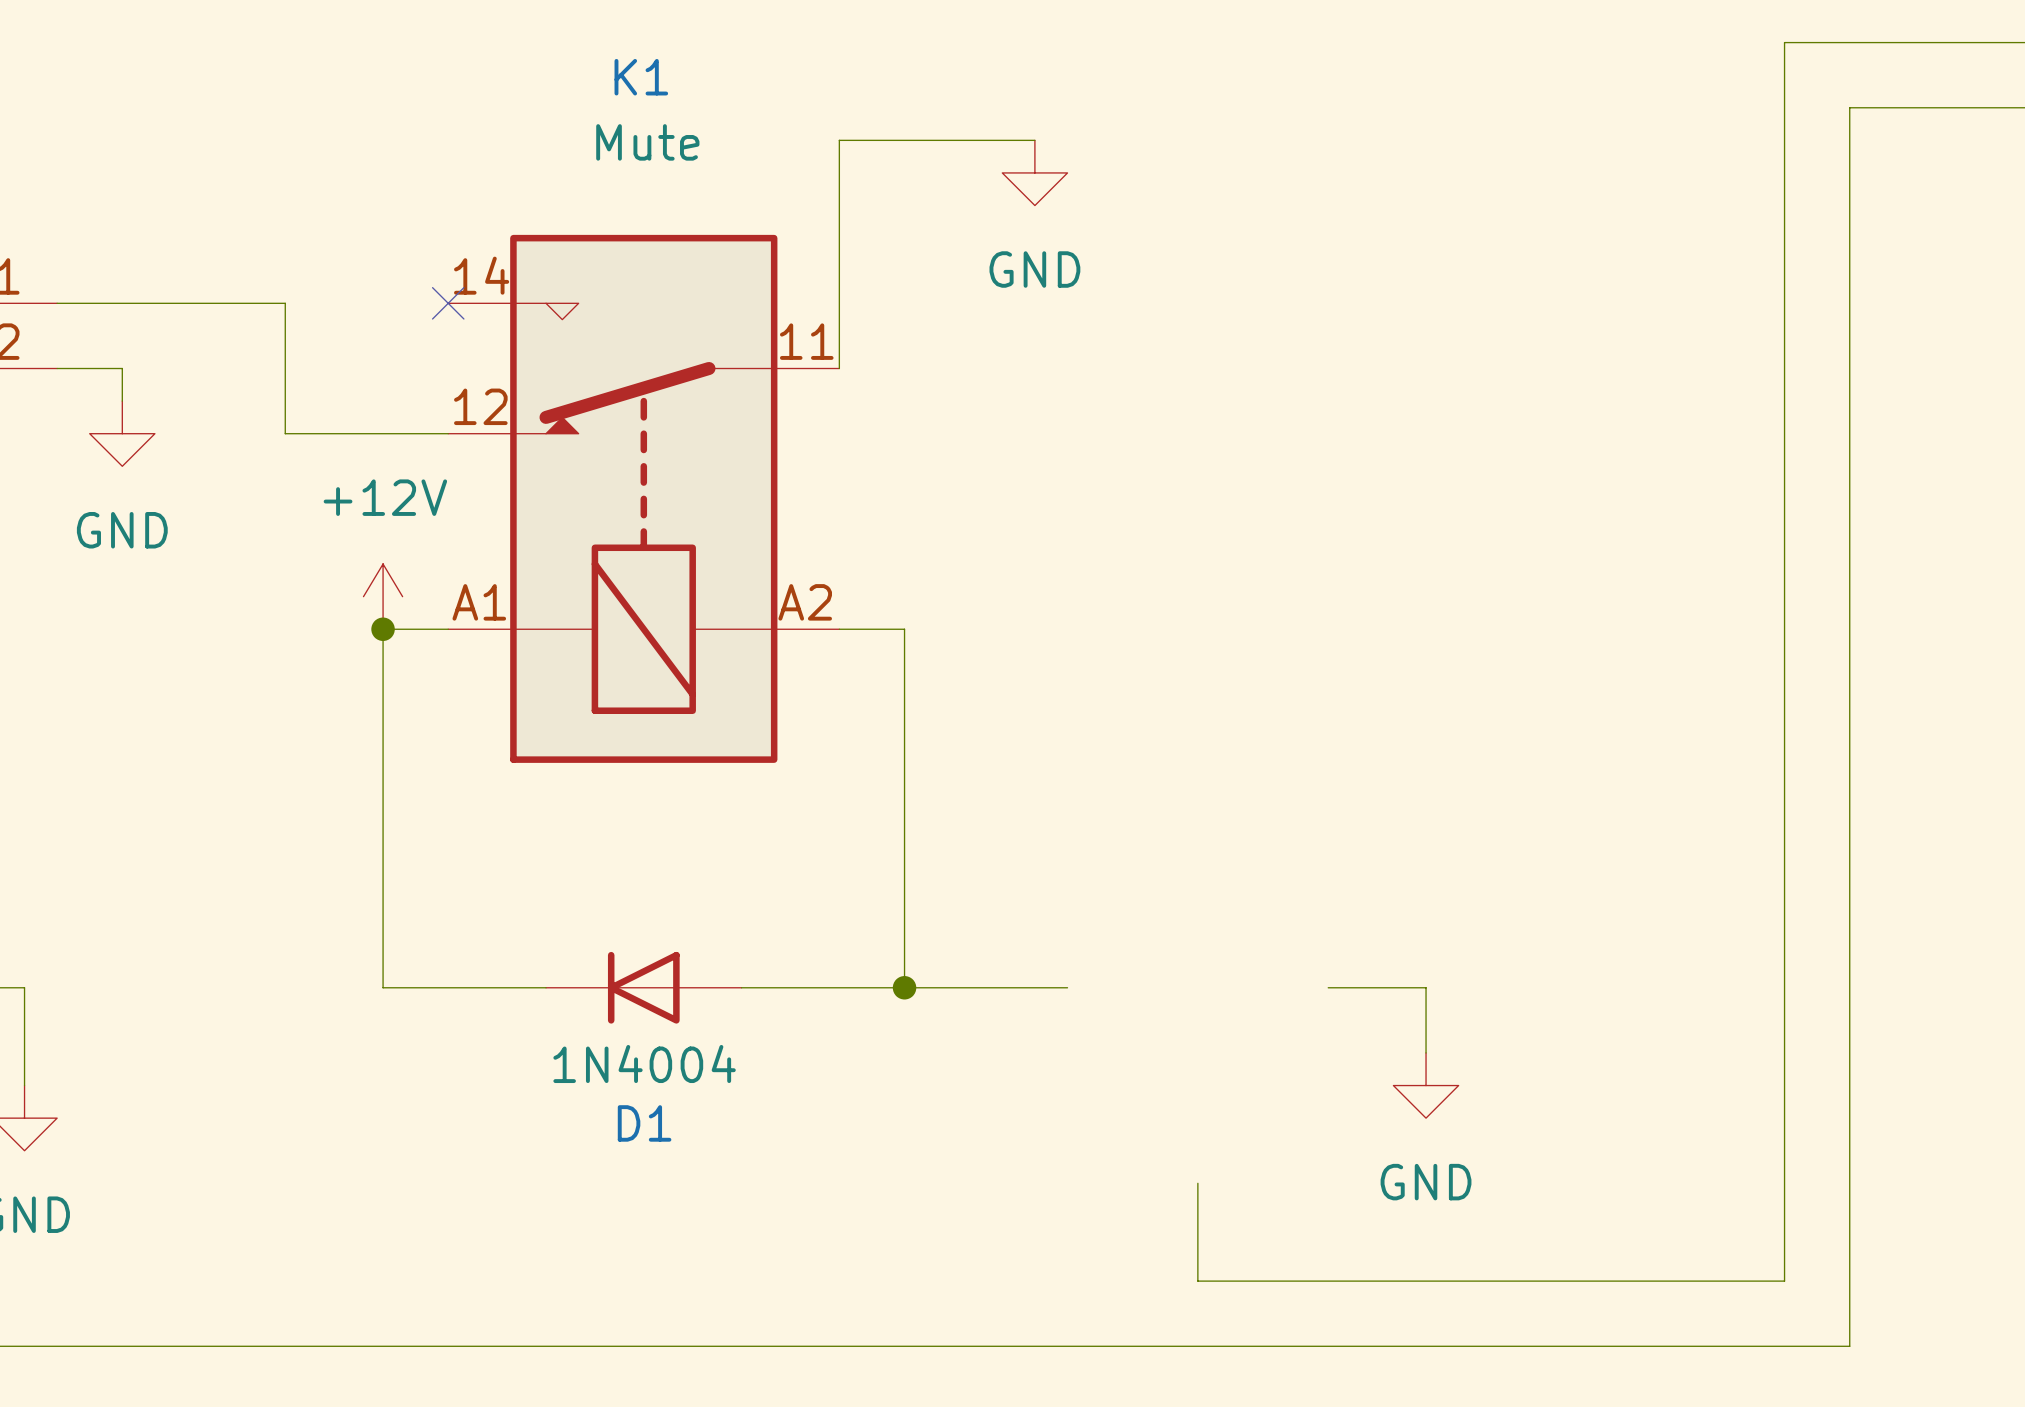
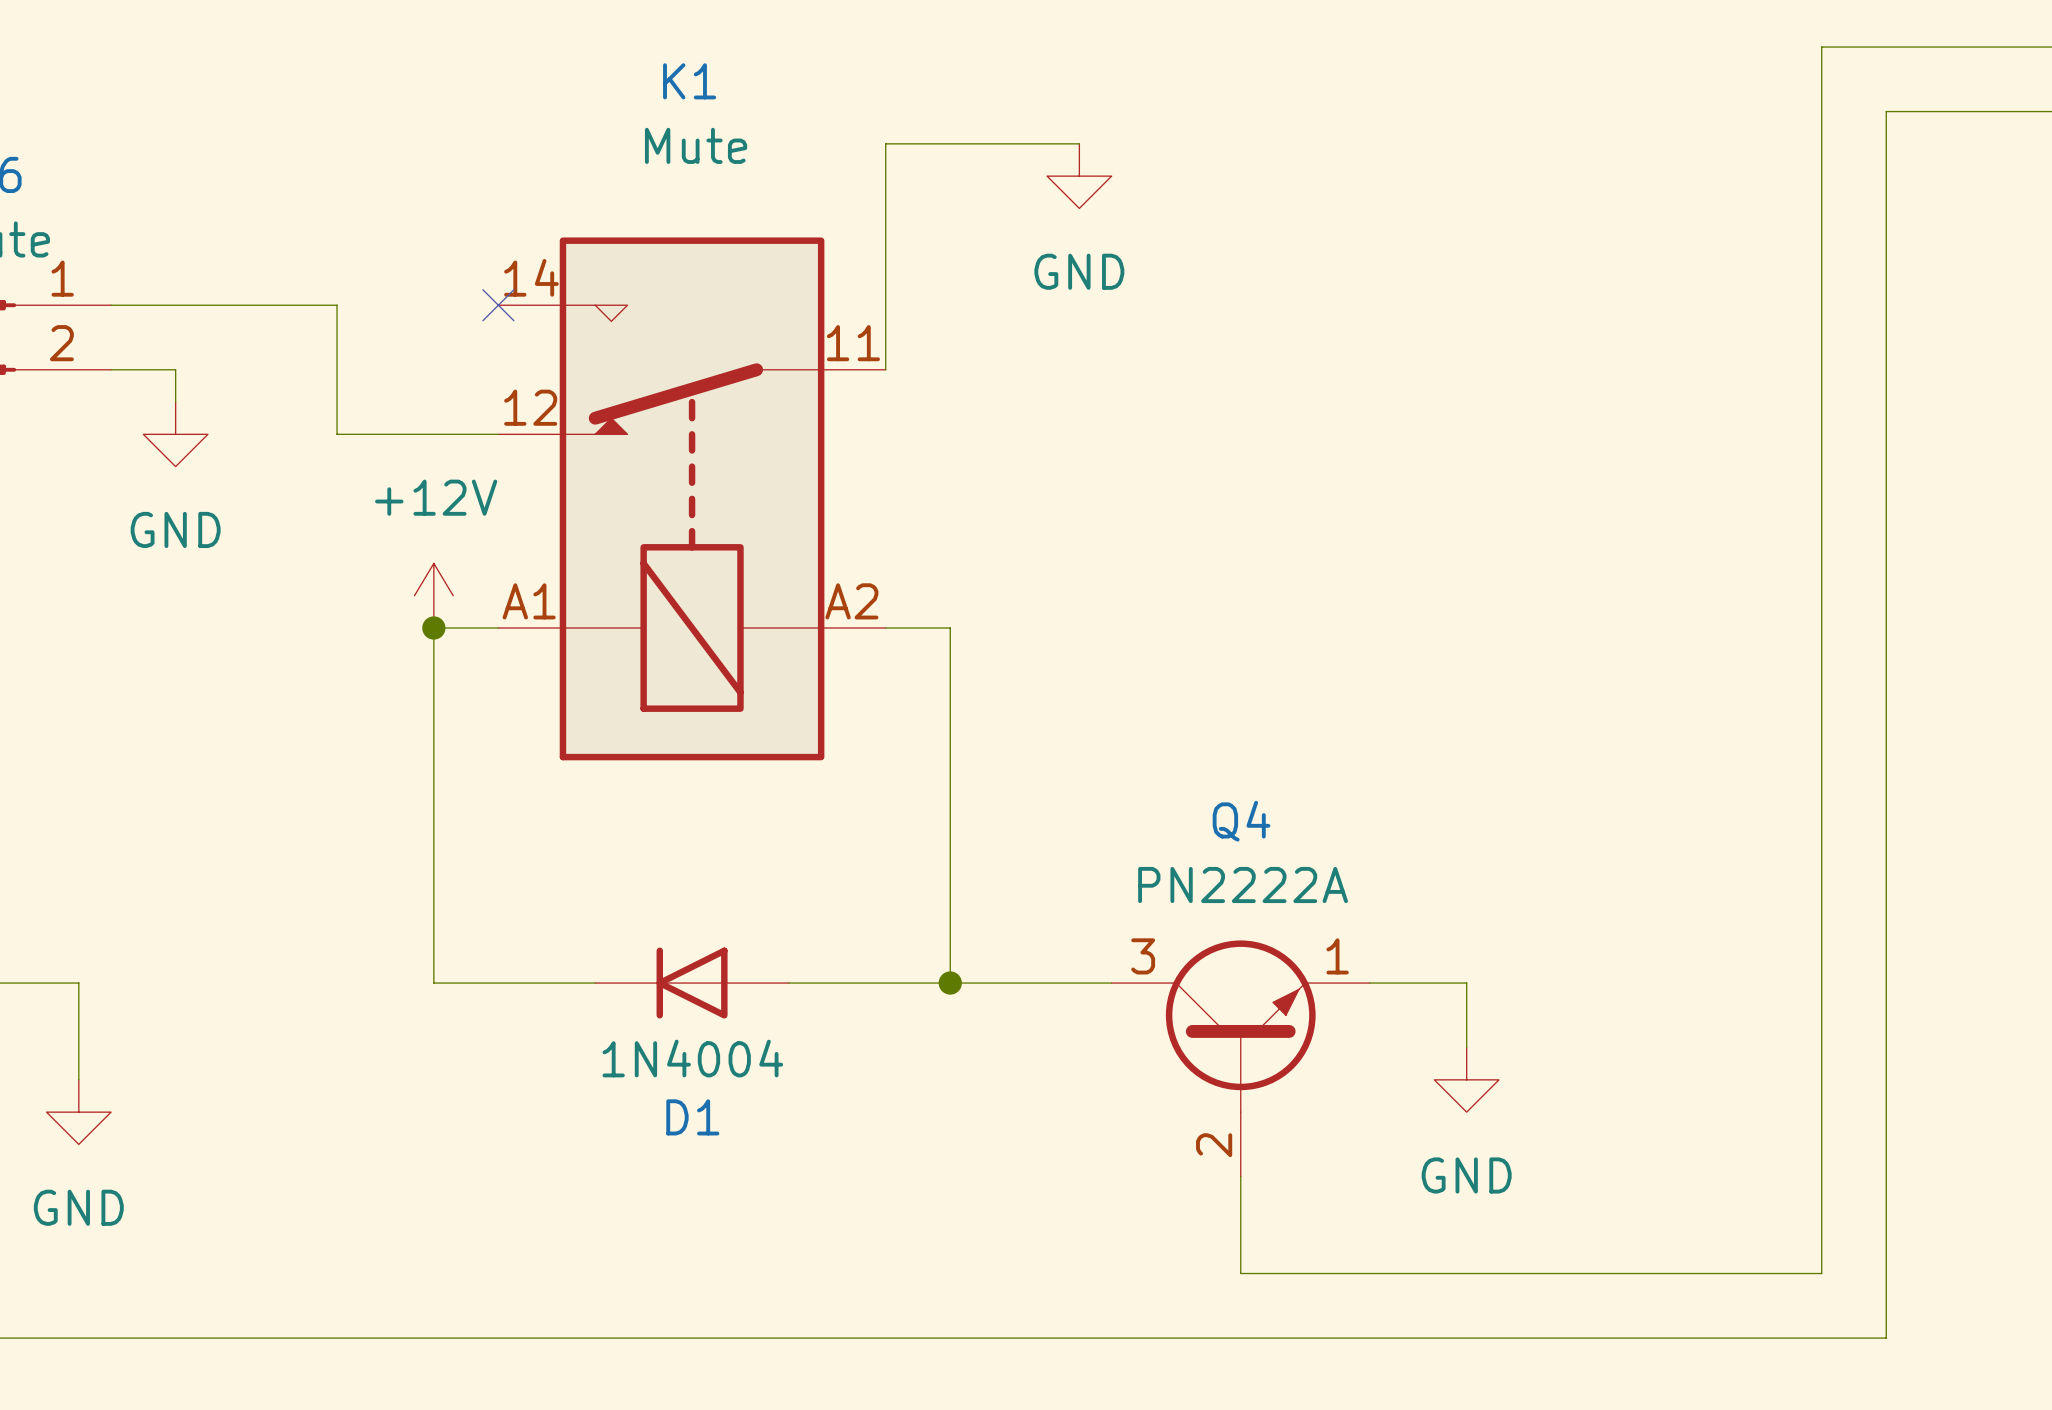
Q4: none -> PN2222A (1240, 1058)

